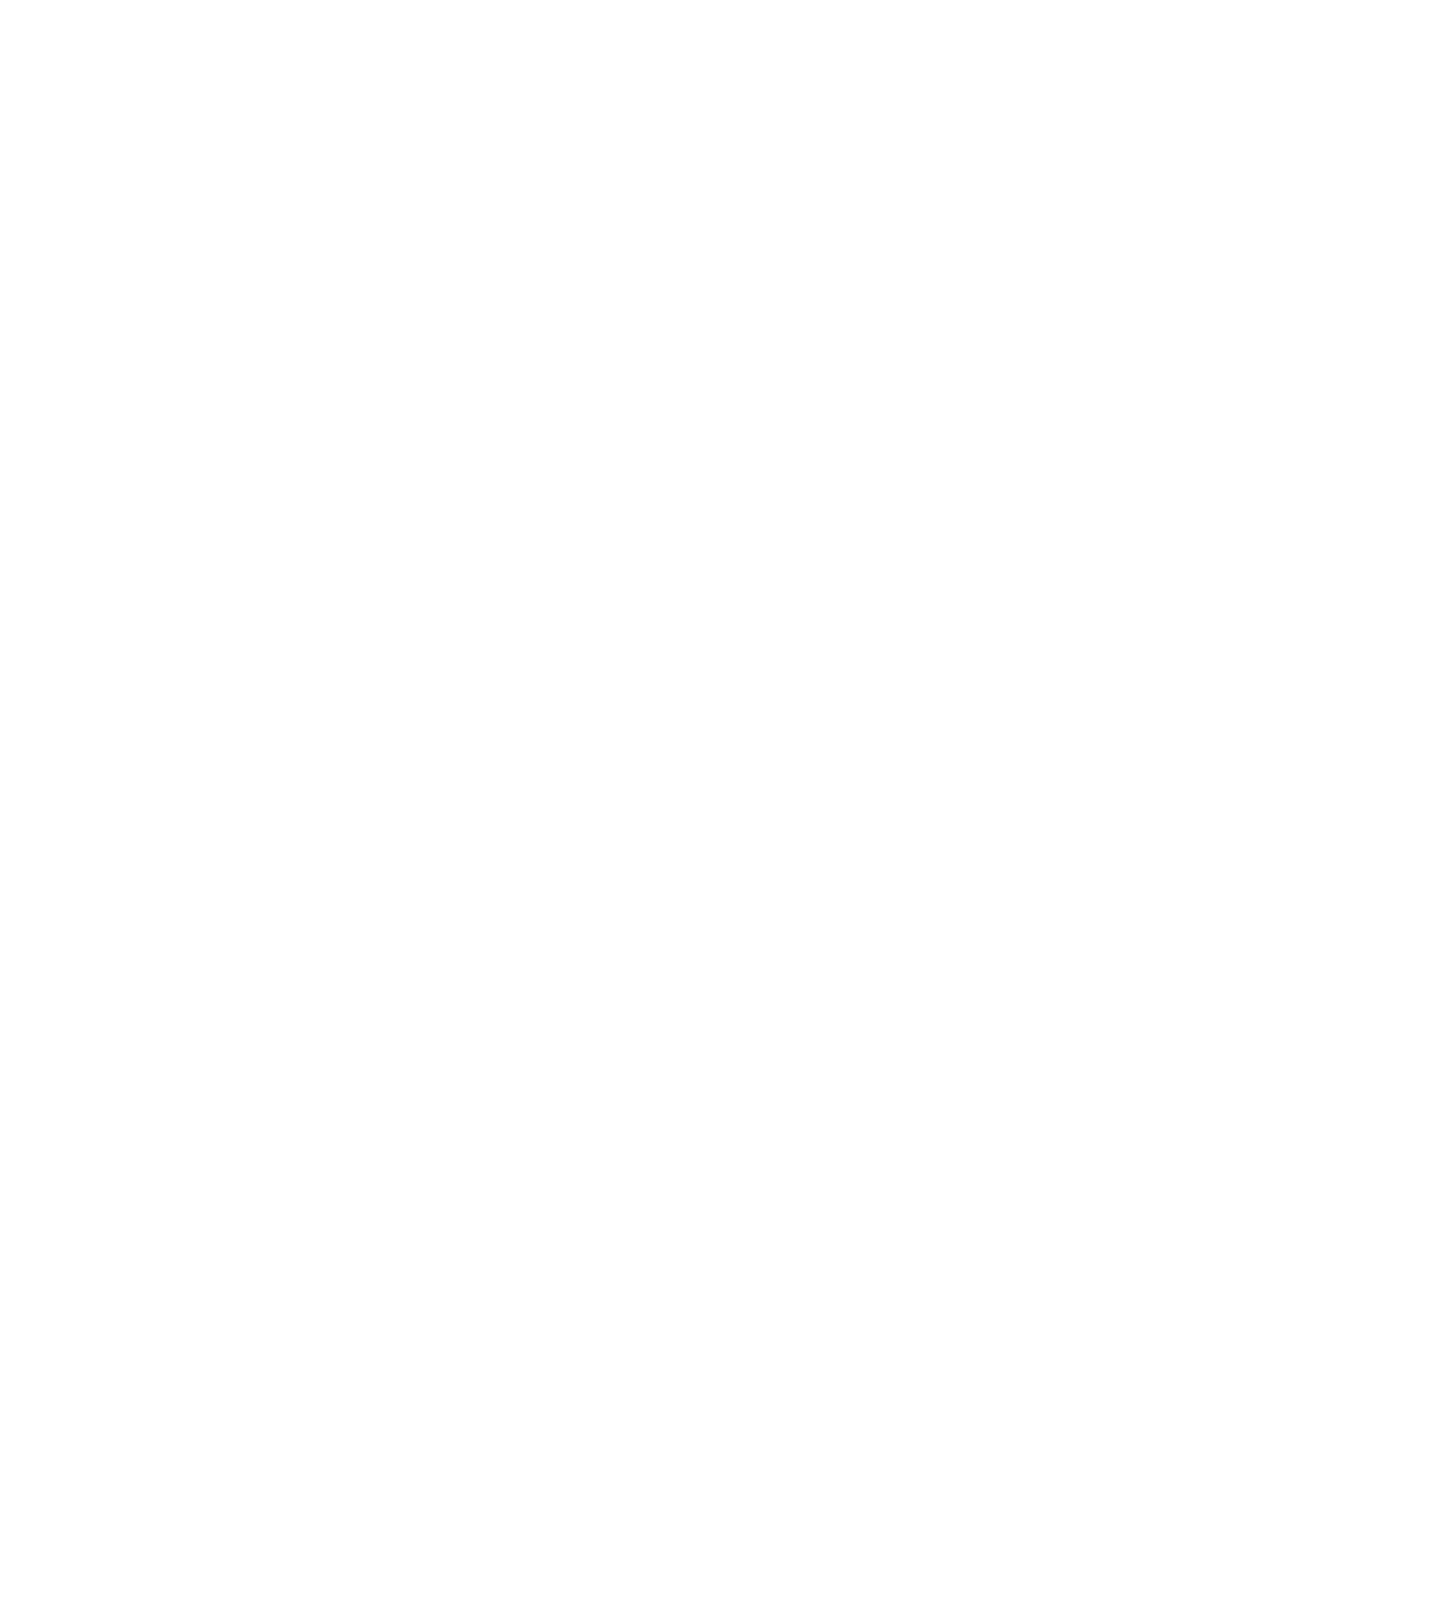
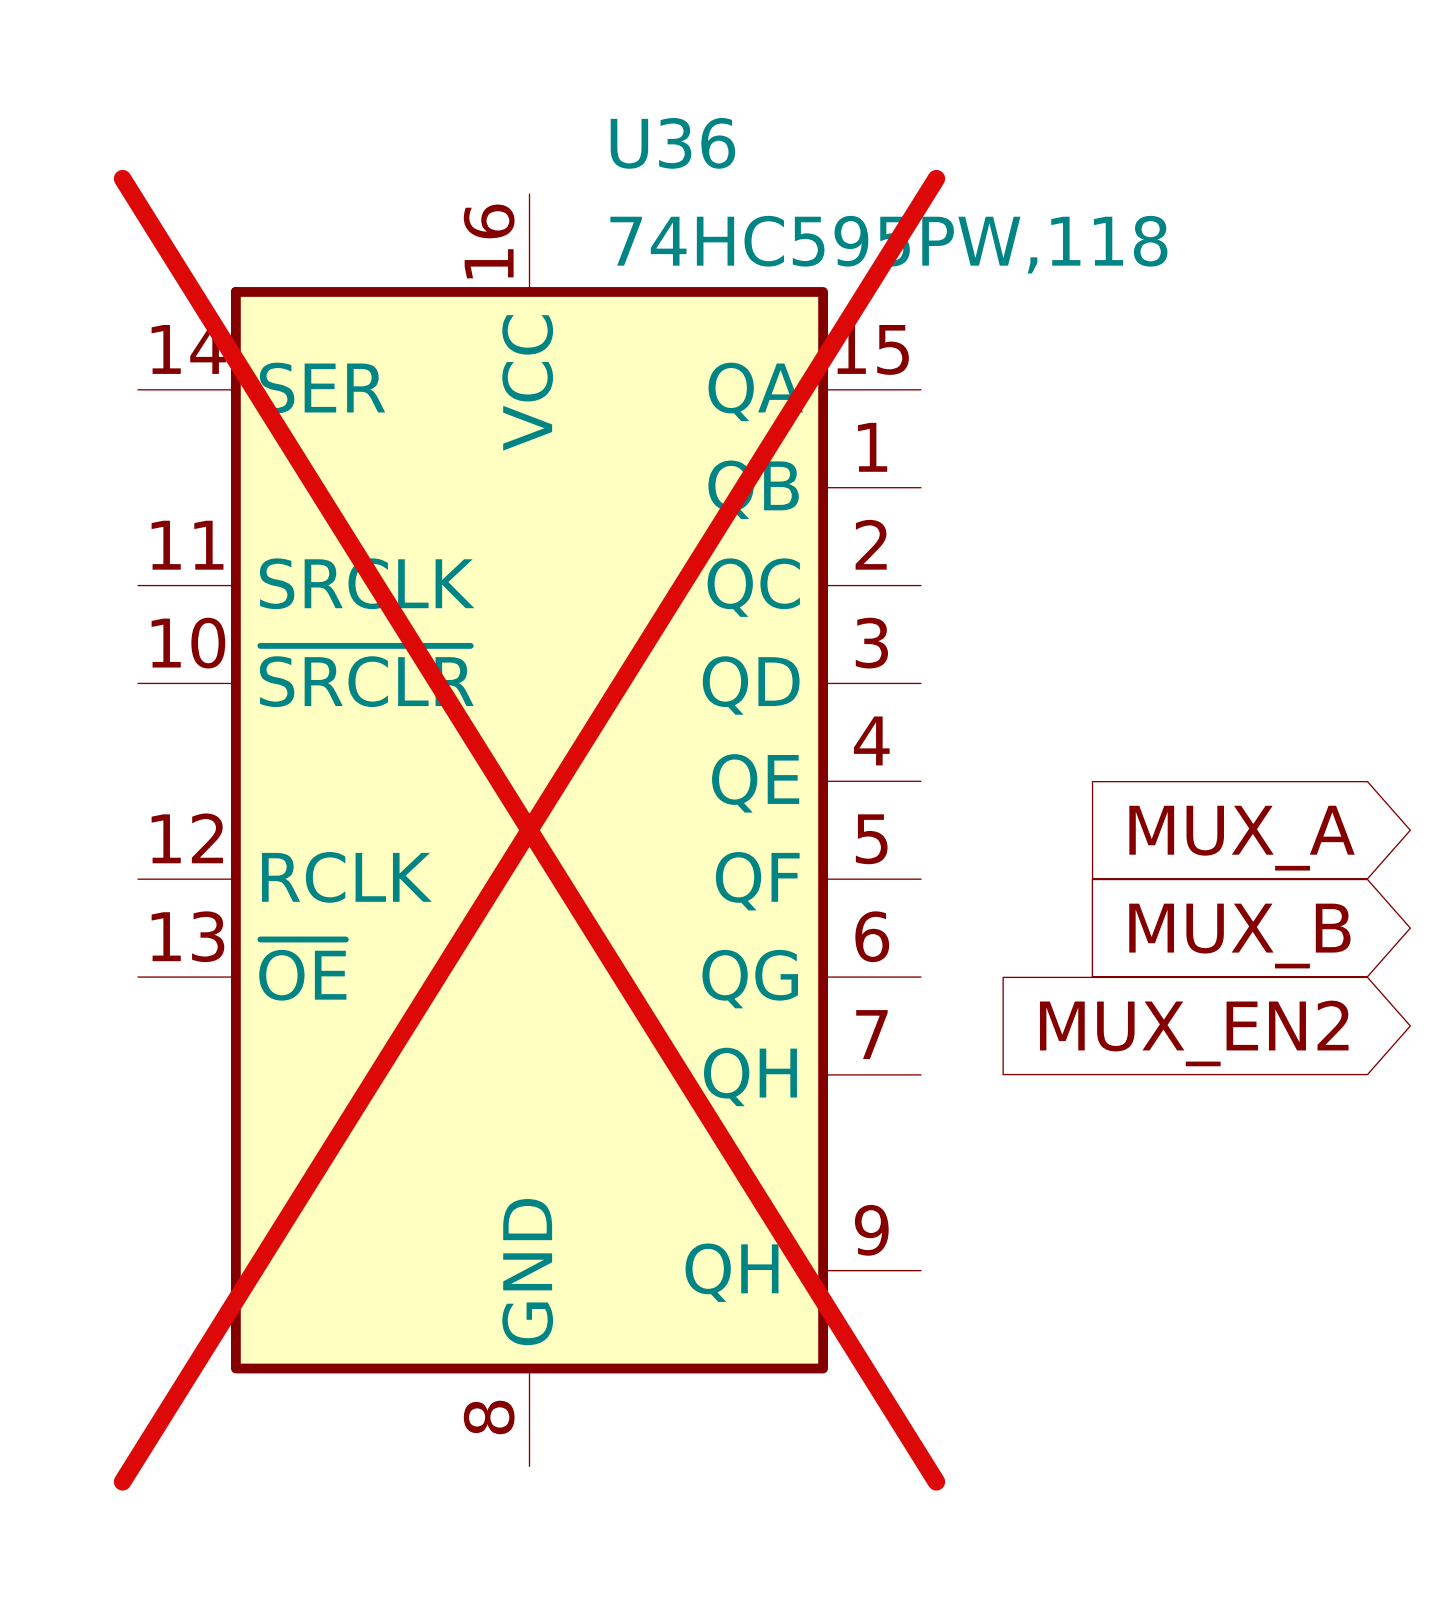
U36: none -> 74HC595PW,118 (529, 830)
global label: none -> MUX_A (1242, 838)
global label: none -> MUX_B (1239, 936)
global label: none -> MUX_EN2 (1194, 1033)

